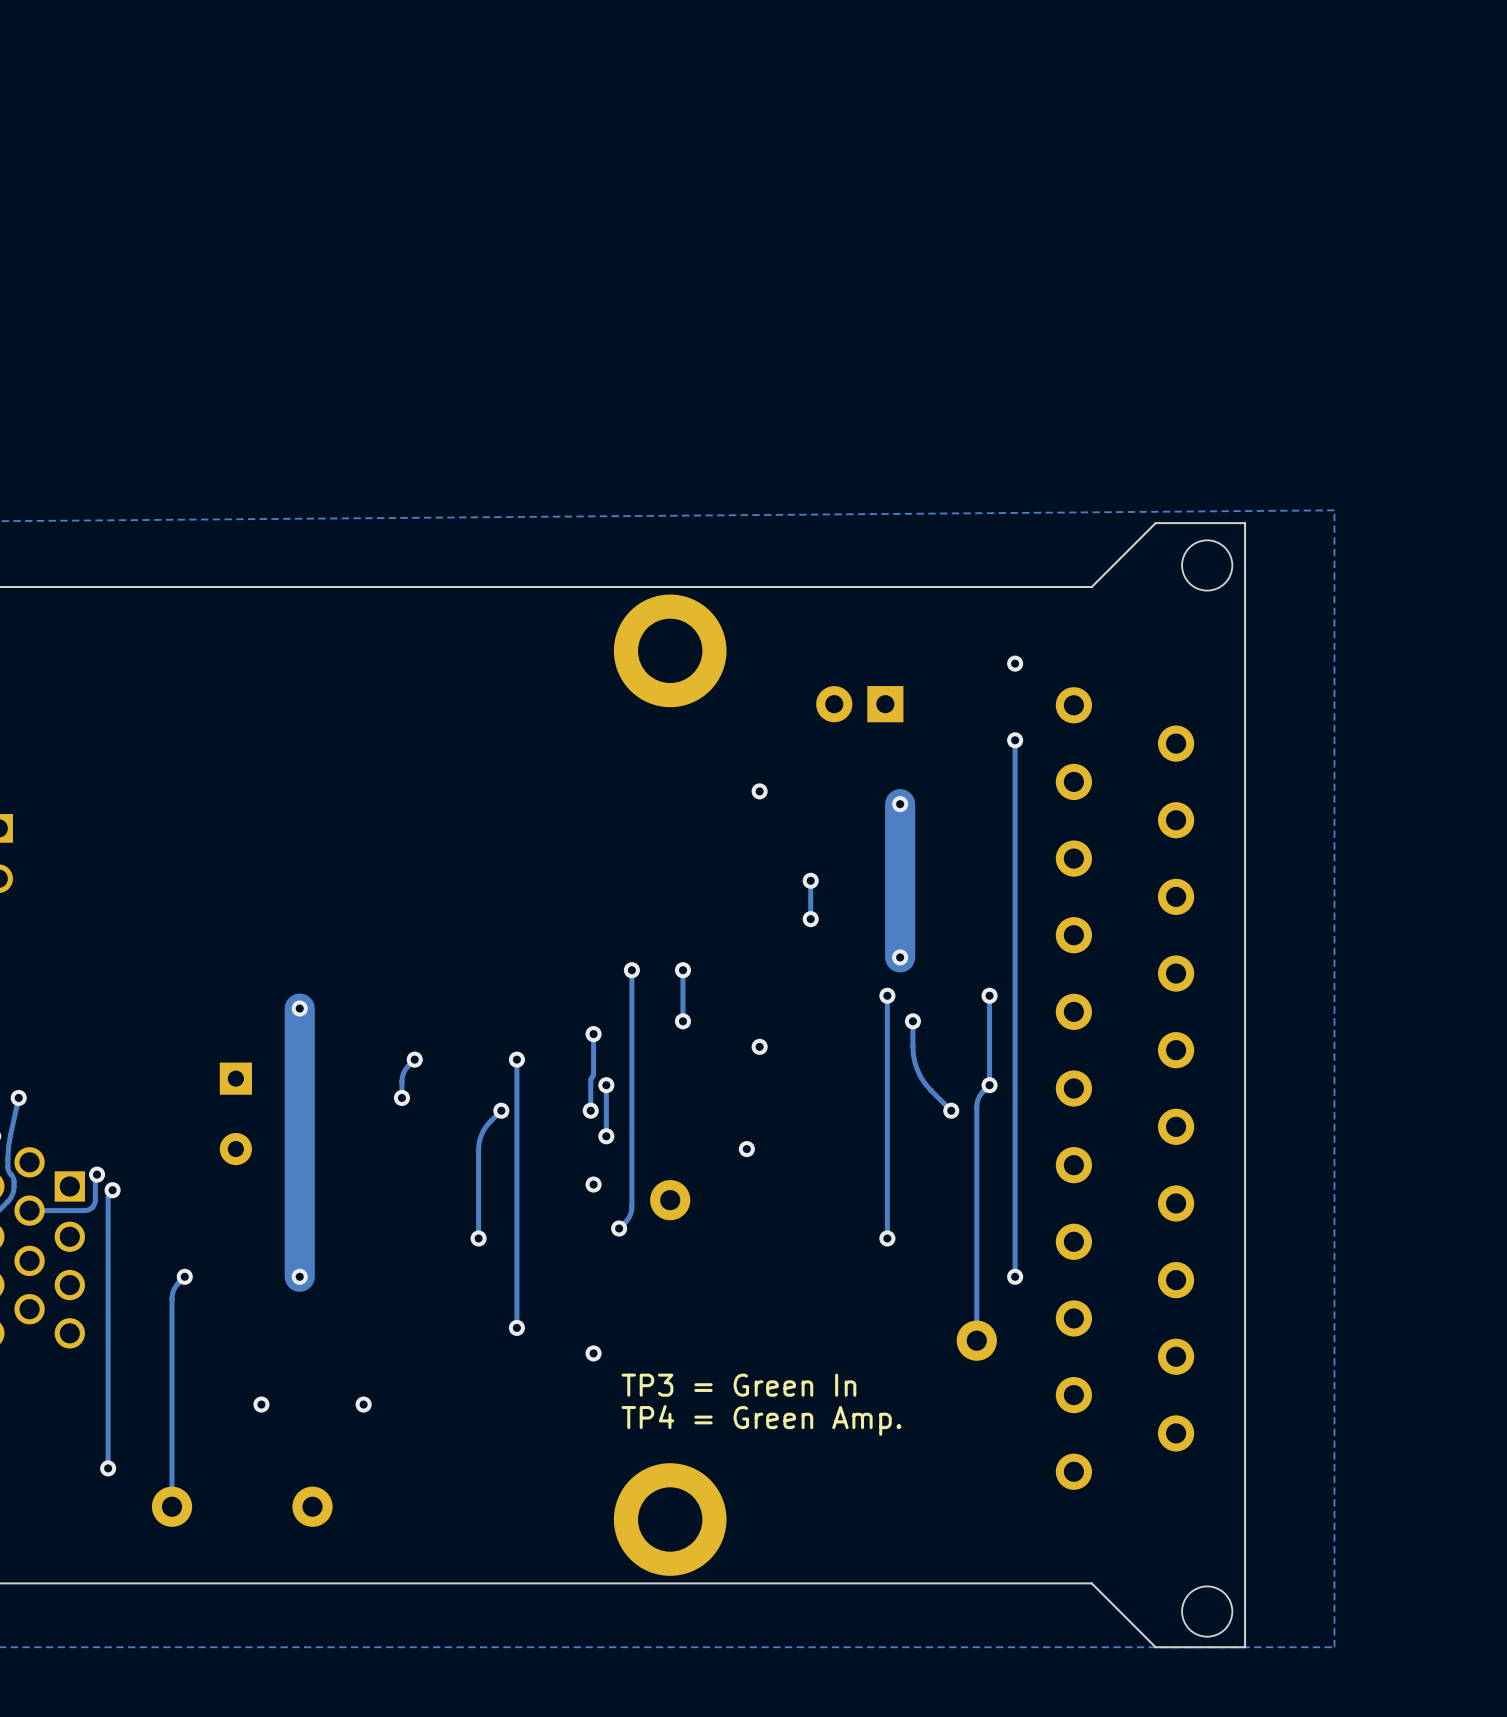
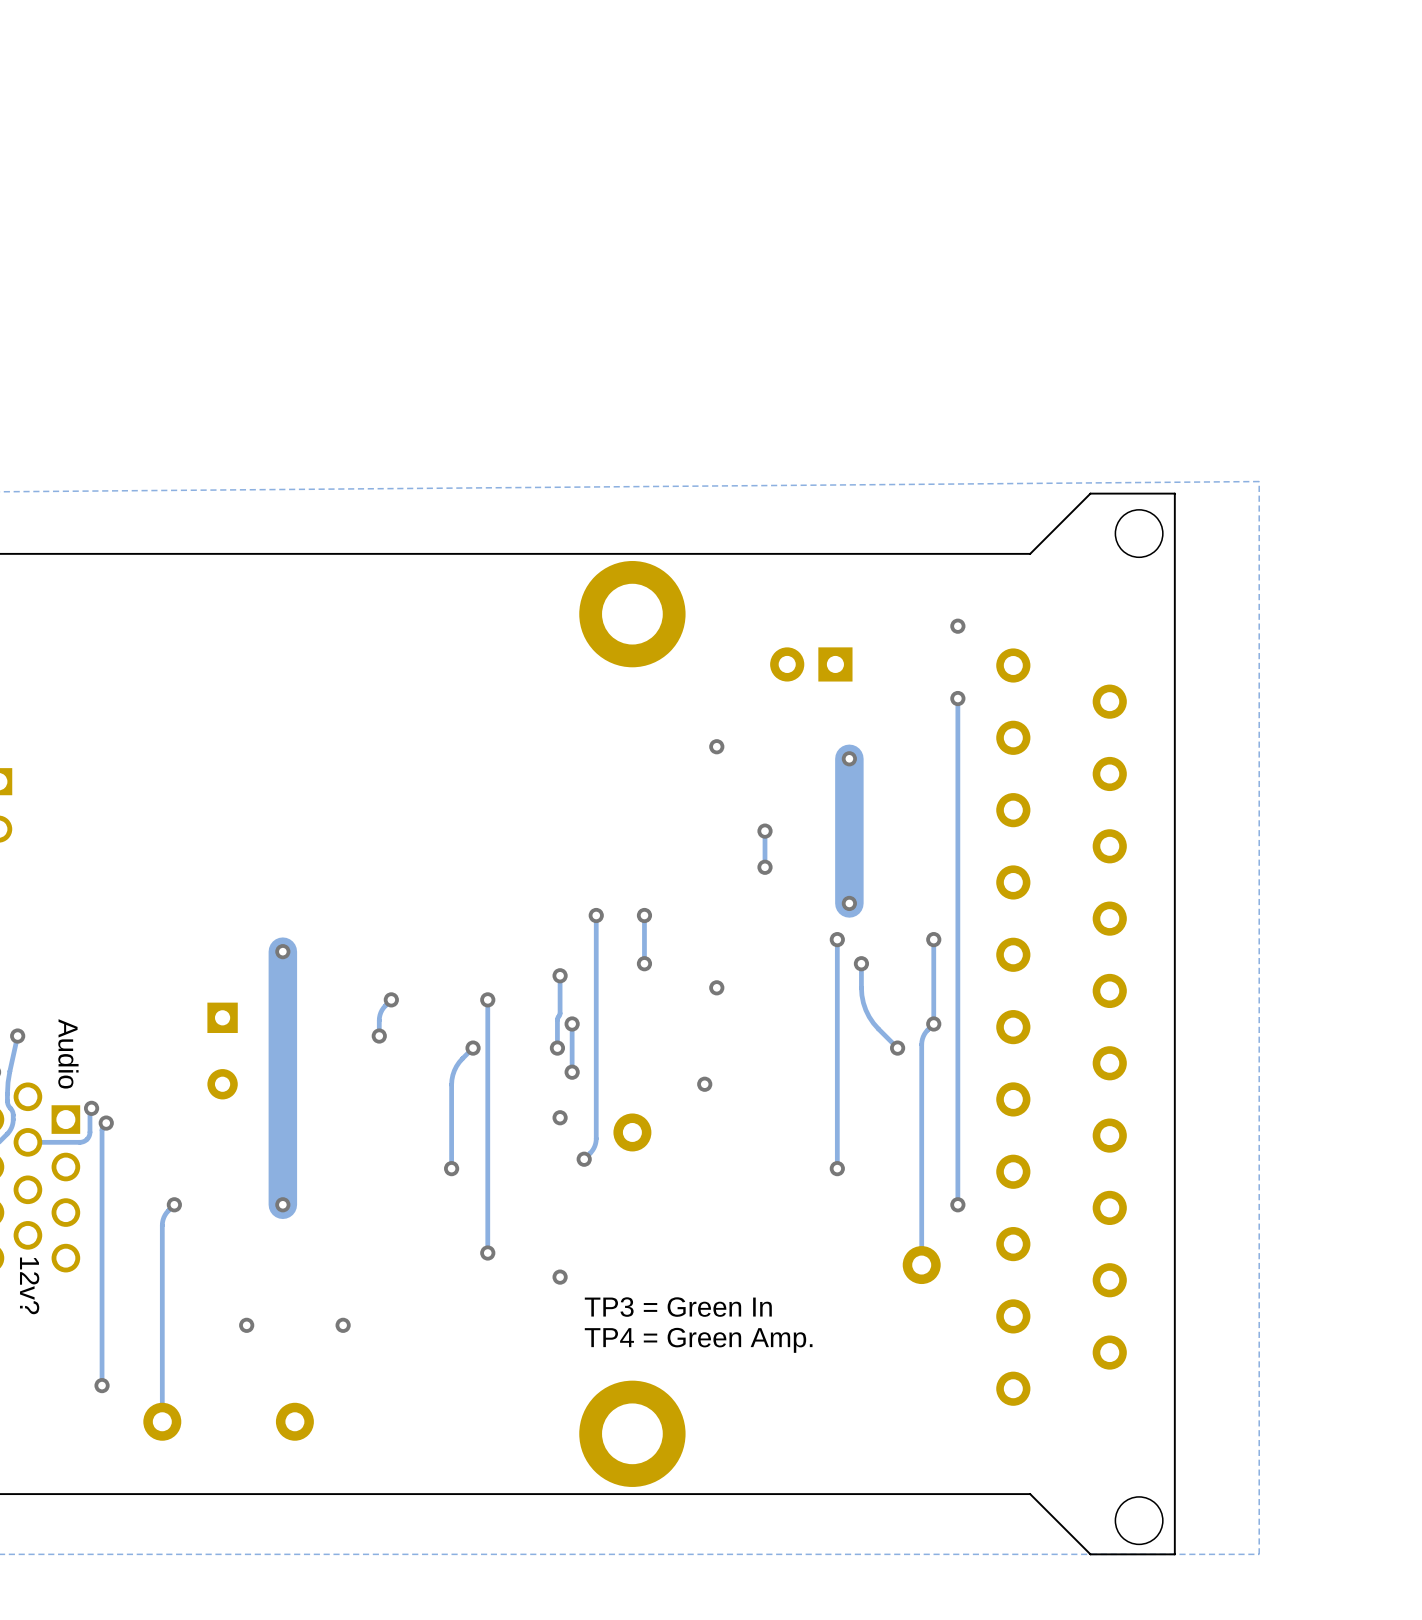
text: none -> Audio (68, 1053)
text: none -> 12v? (29, 1285)

